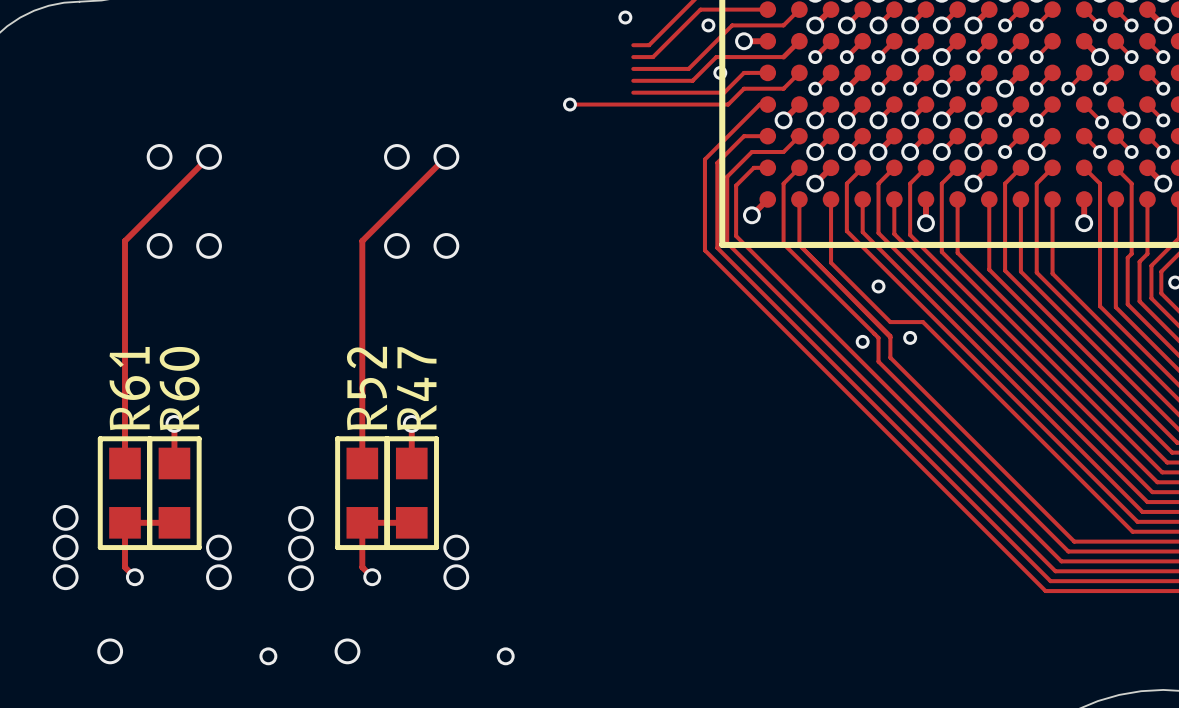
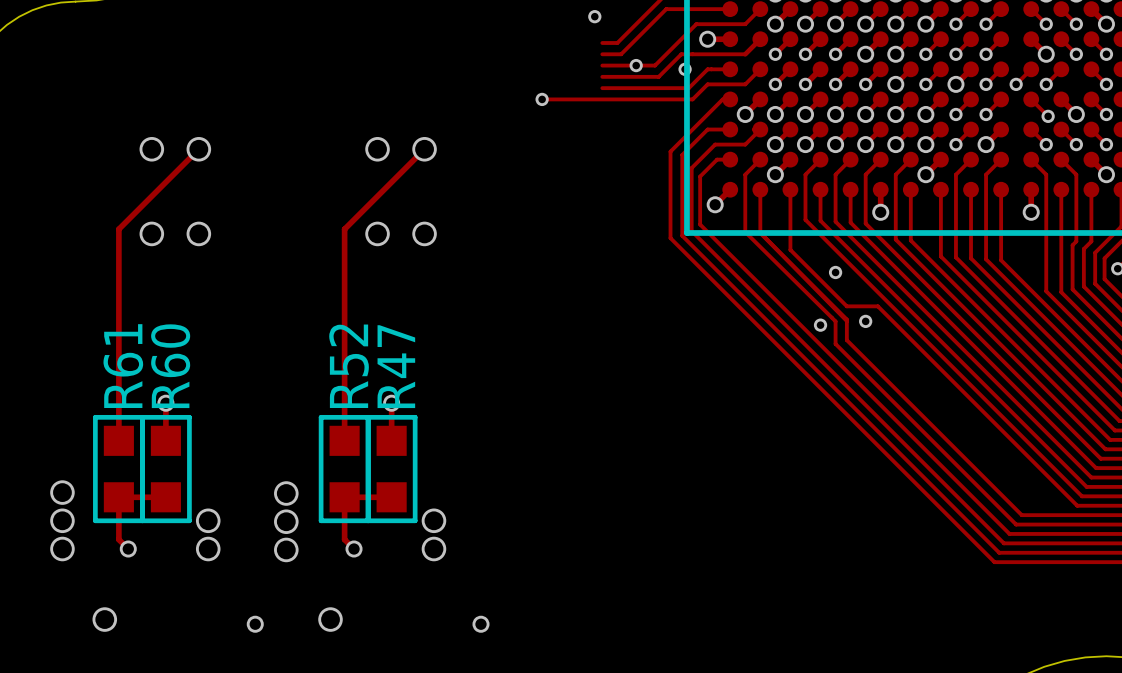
via position: (708, 25) -> (636, 65)

